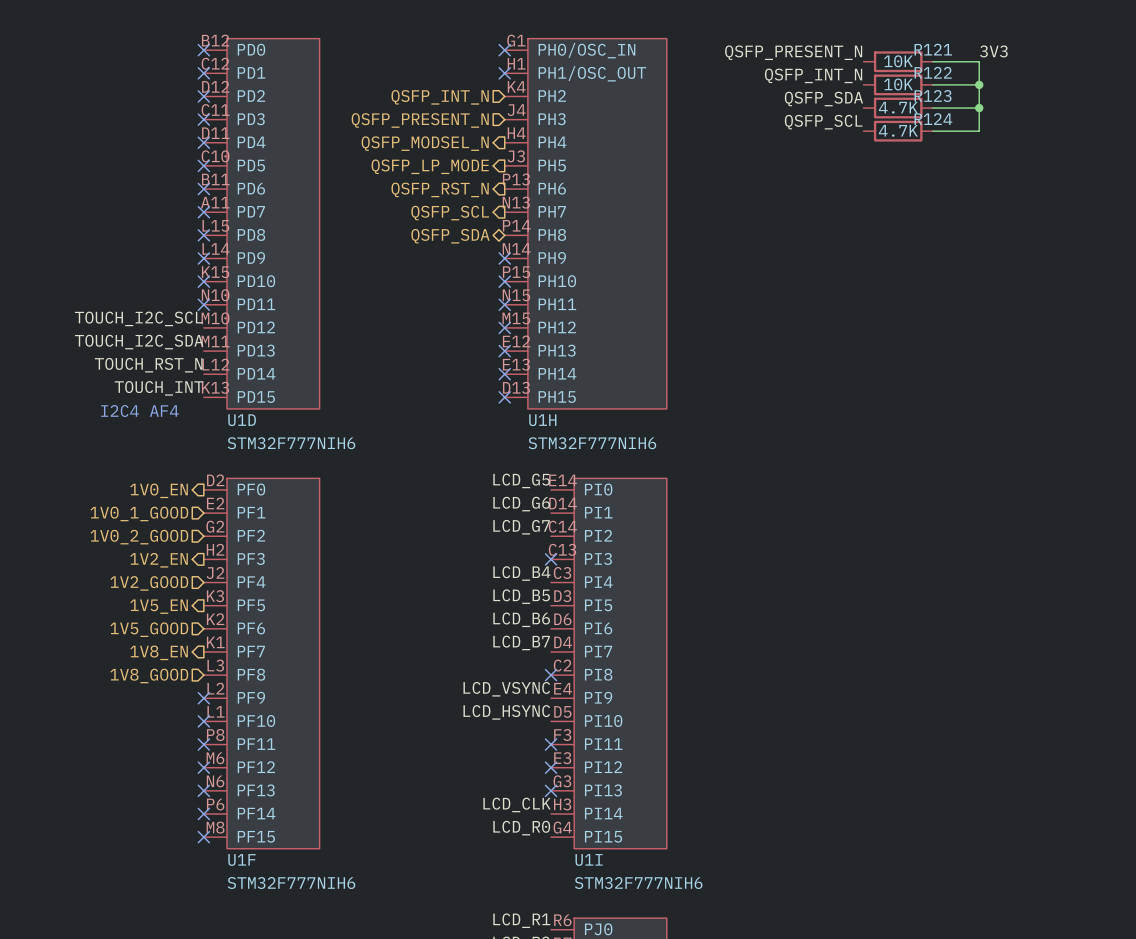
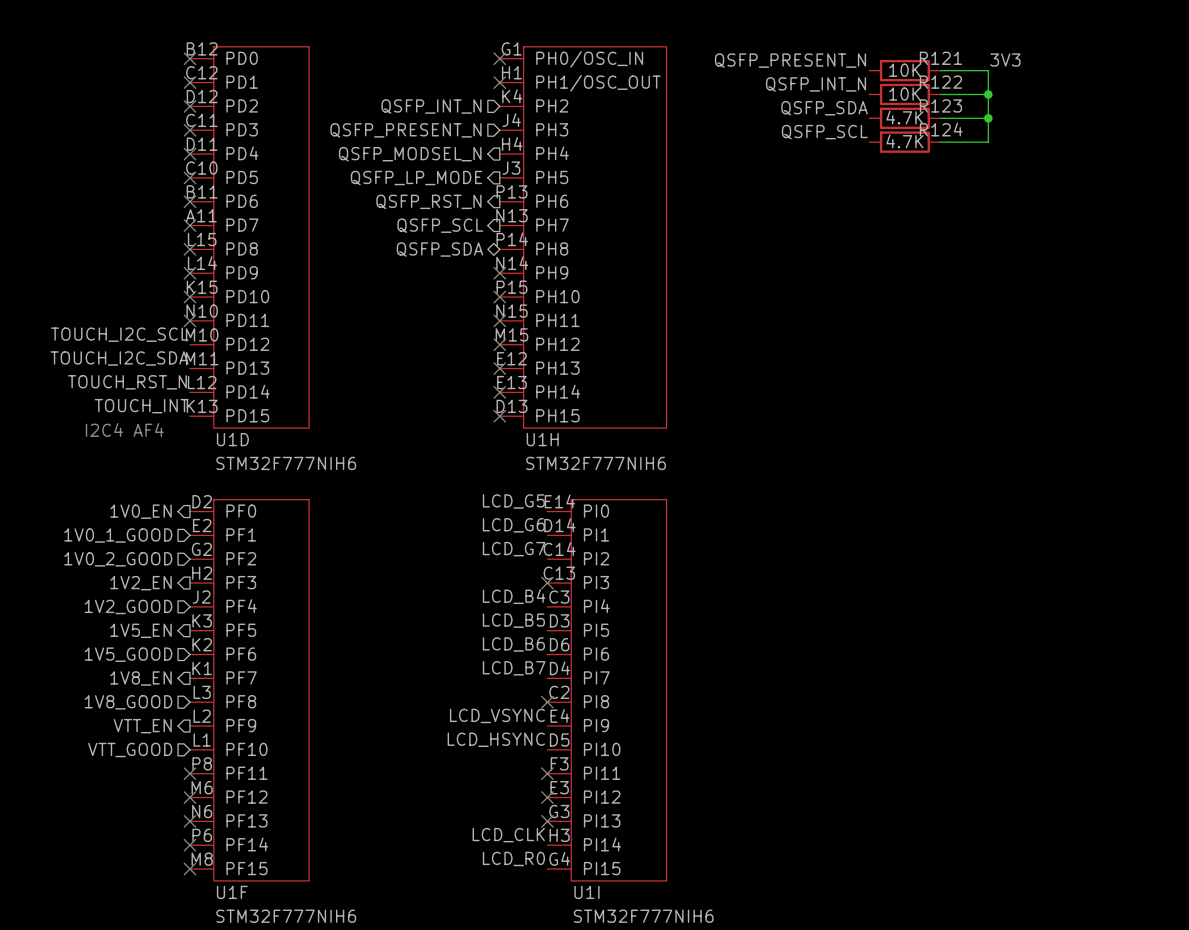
no-connect mark: (203, 698) -> none
hierarchical label: none -> VTT_EN (142, 726)
no-connect mark: (203, 721) -> none
hierarchical label: none -> VTT_GOOD (130, 749)

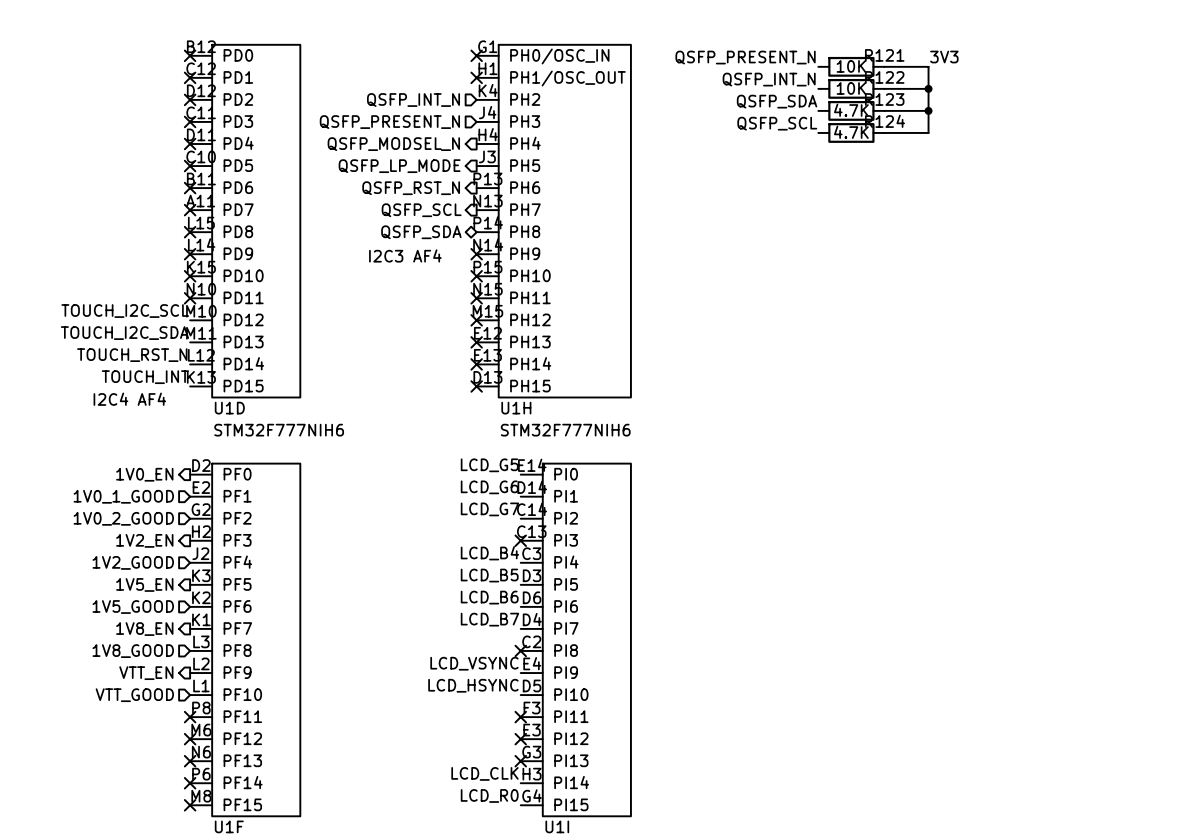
text: none -> I2C3 AF4 (405, 255)

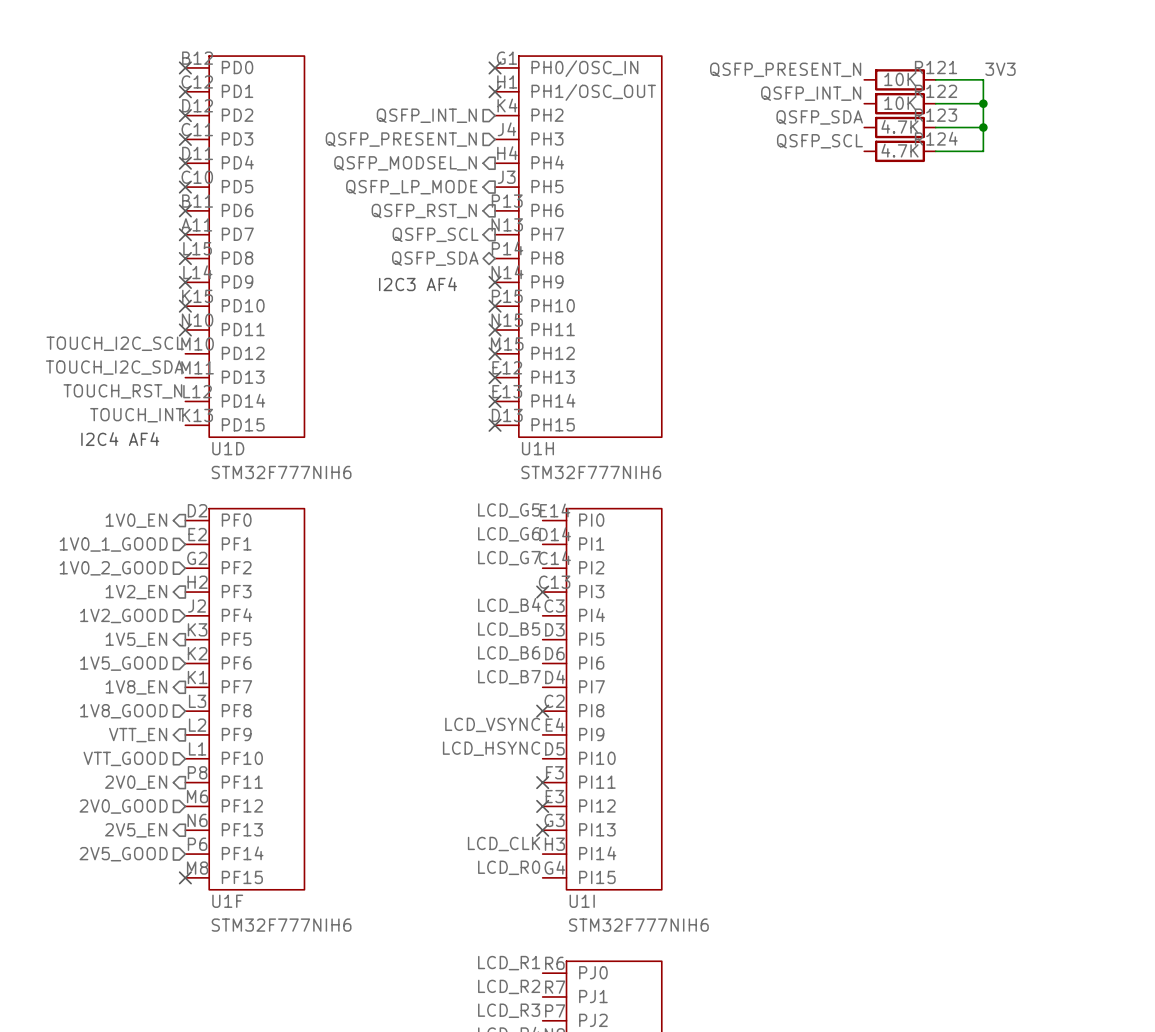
hierarchical label: none -> 2V0_EN (136, 782)
no-connect mark: (190, 717) -> none
hierarchical label: none -> 2V0_GOOD (123, 806)
no-connect mark: (190, 739) -> none
hierarchical label: none -> 2V5_EN (136, 830)
no-connect mark: (190, 761) -> none
hierarchical label: none -> 2V5_GOOD (123, 854)
no-connect mark: (190, 783) -> none

